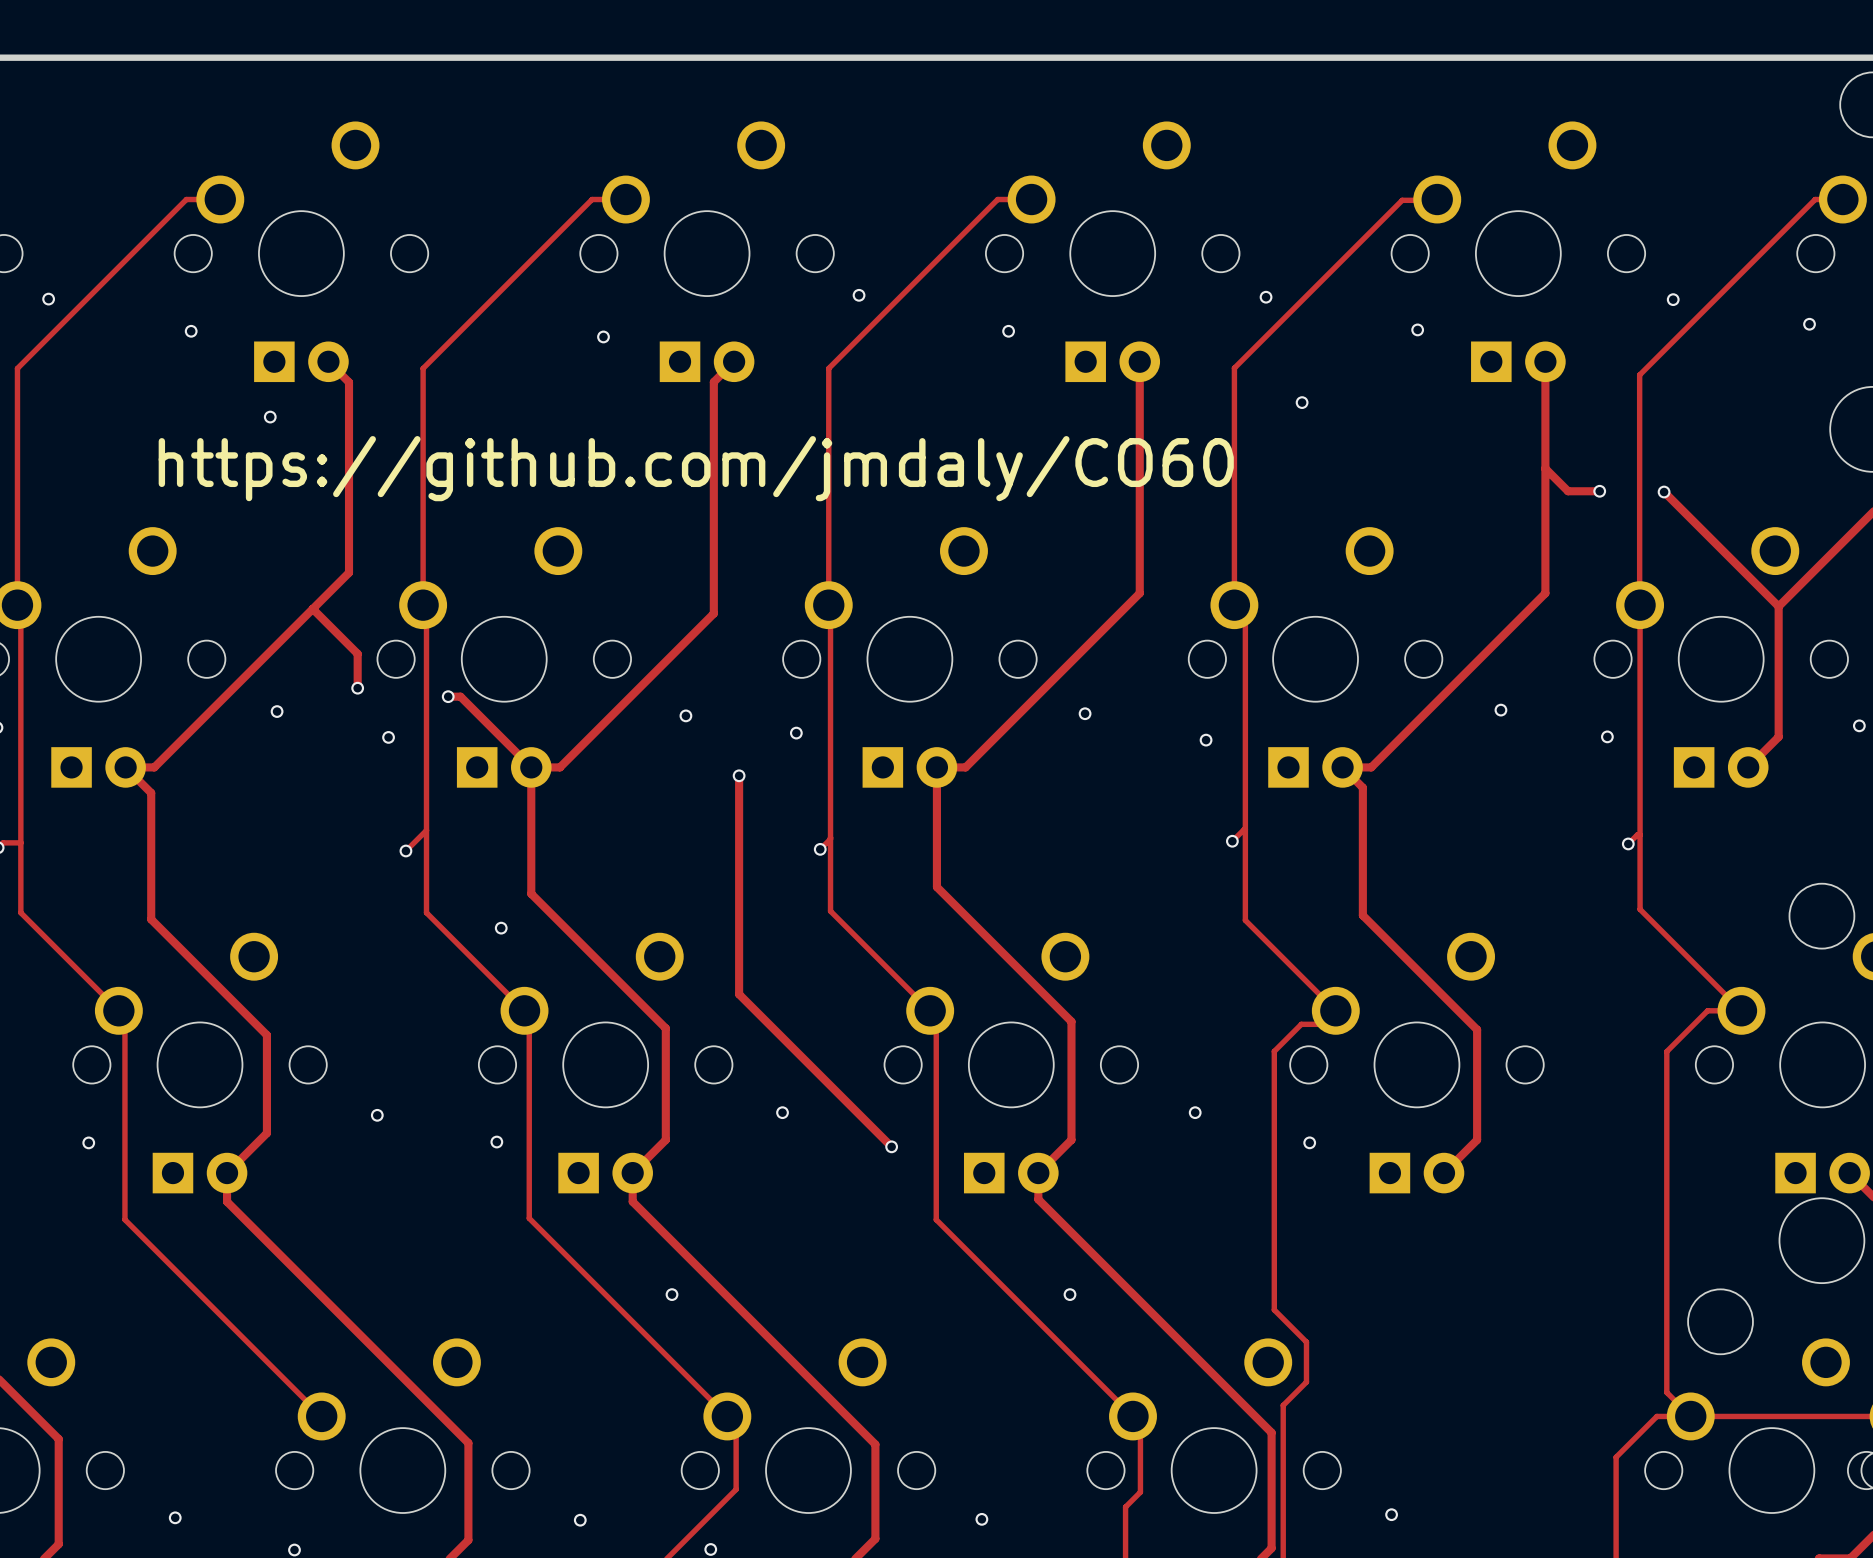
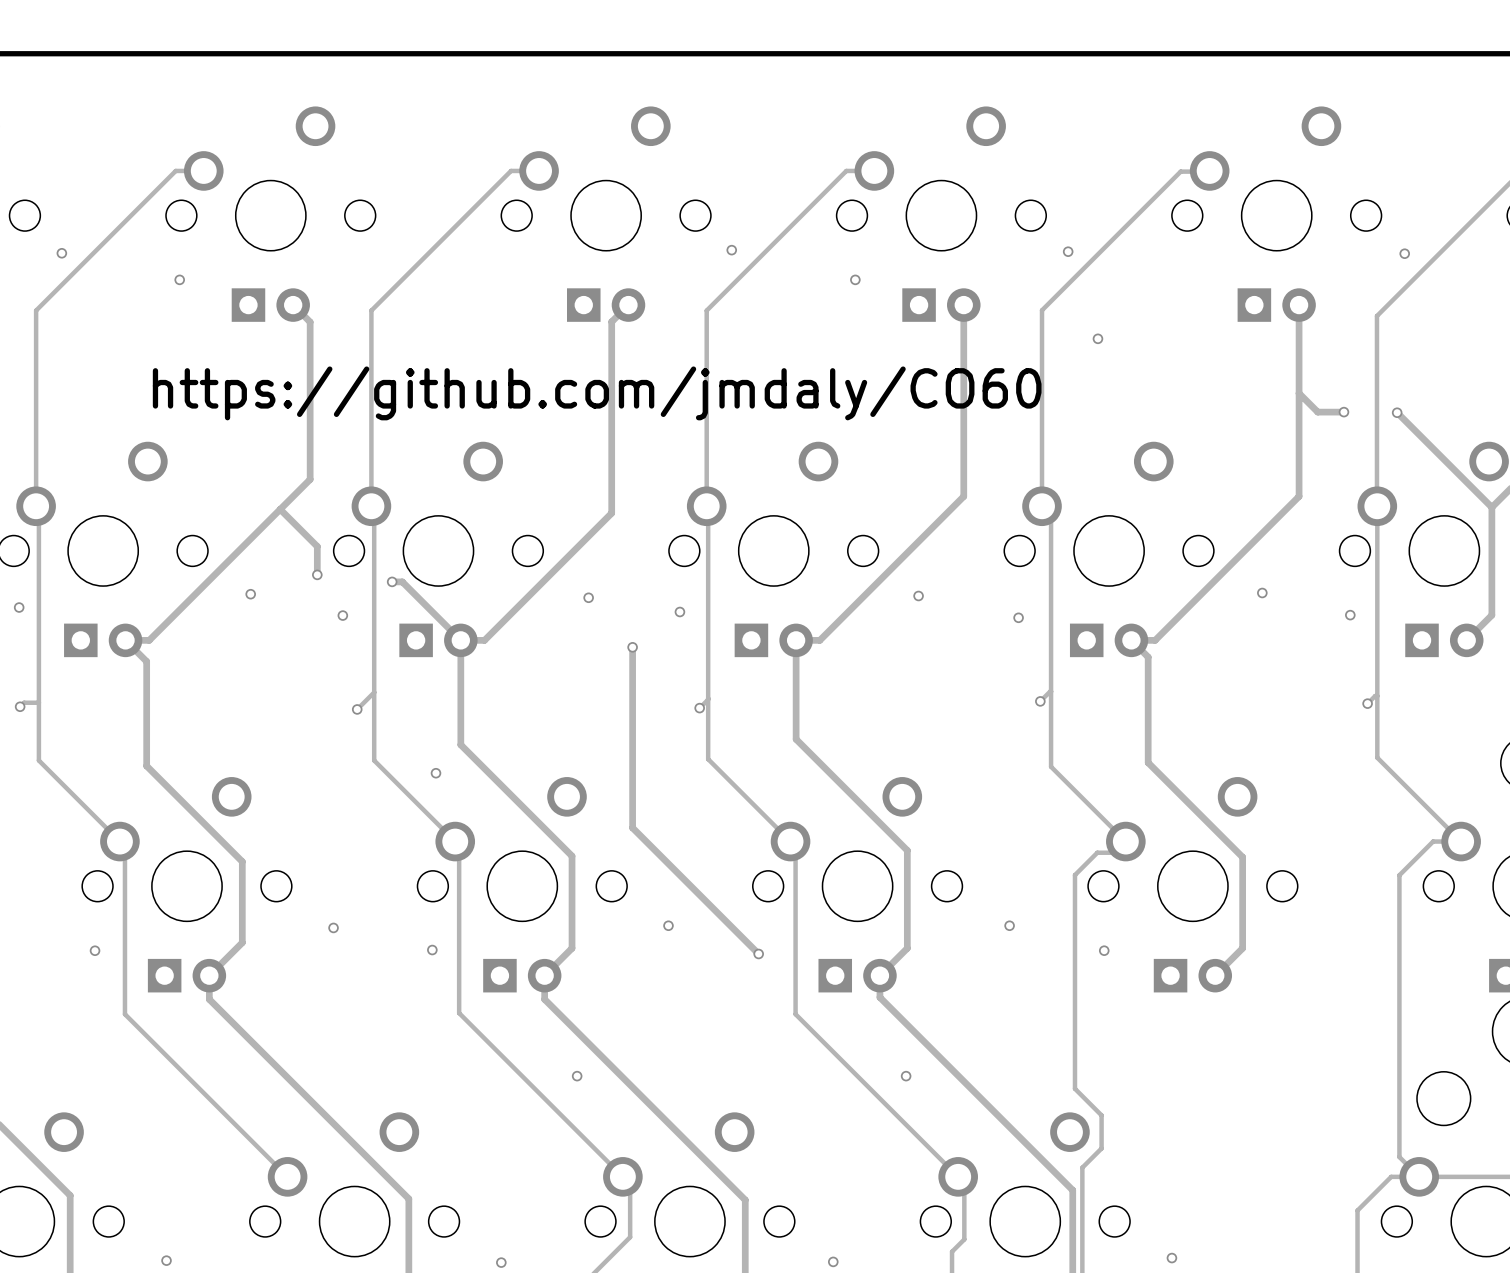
via: (1417, 329) -> none
via: (603, 336) -> none
via: (270, 417) -> none

